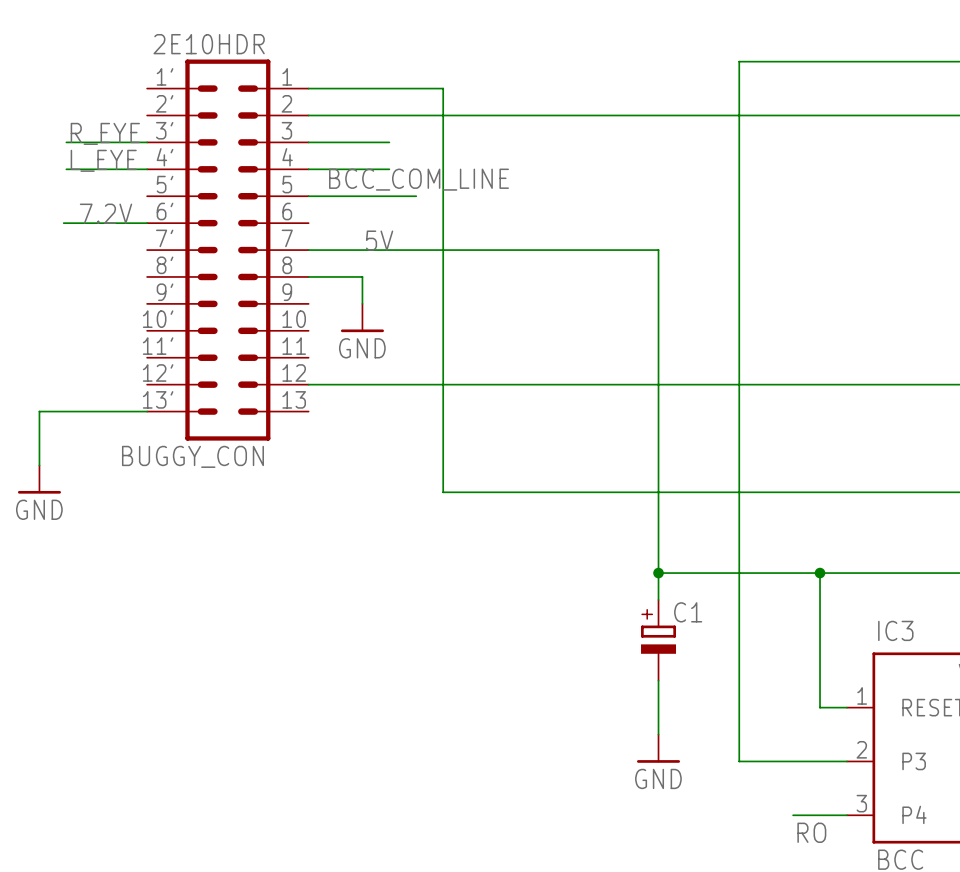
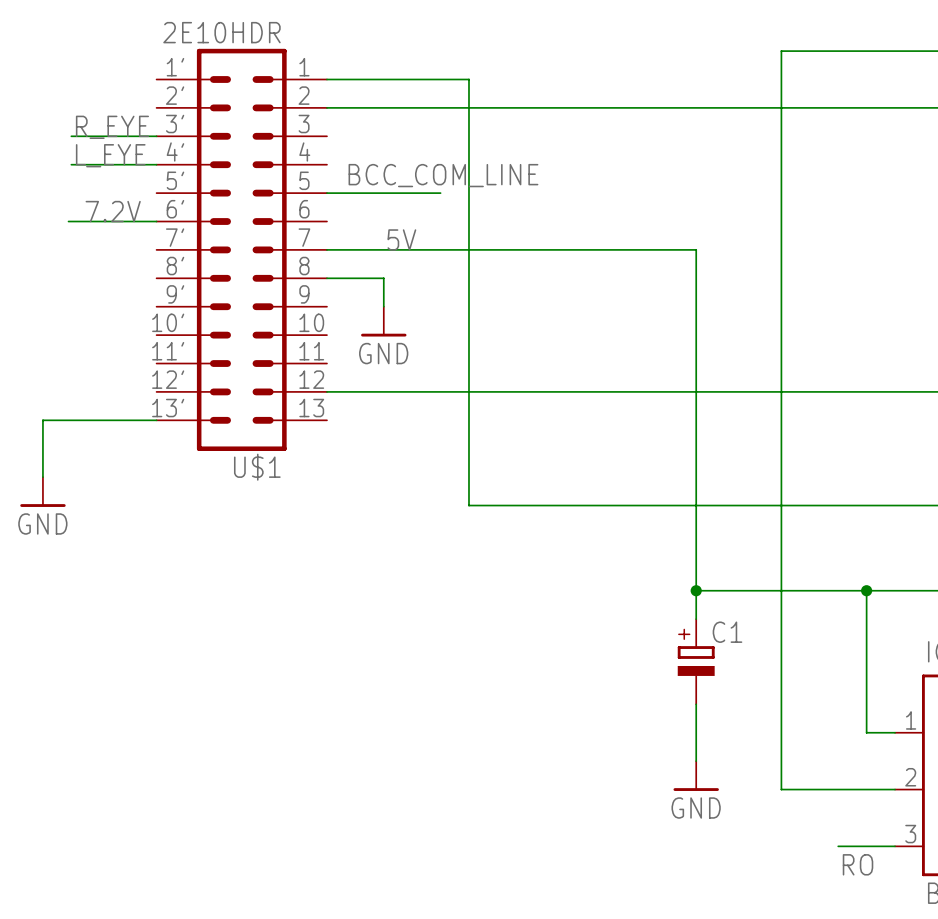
wire: (308, 142) (389, 142) -> none
wire: (308, 169) (389, 169) -> none
BUGGY_CON name: BUGGY_CON (192, 456) -> U$1 (257, 467)

